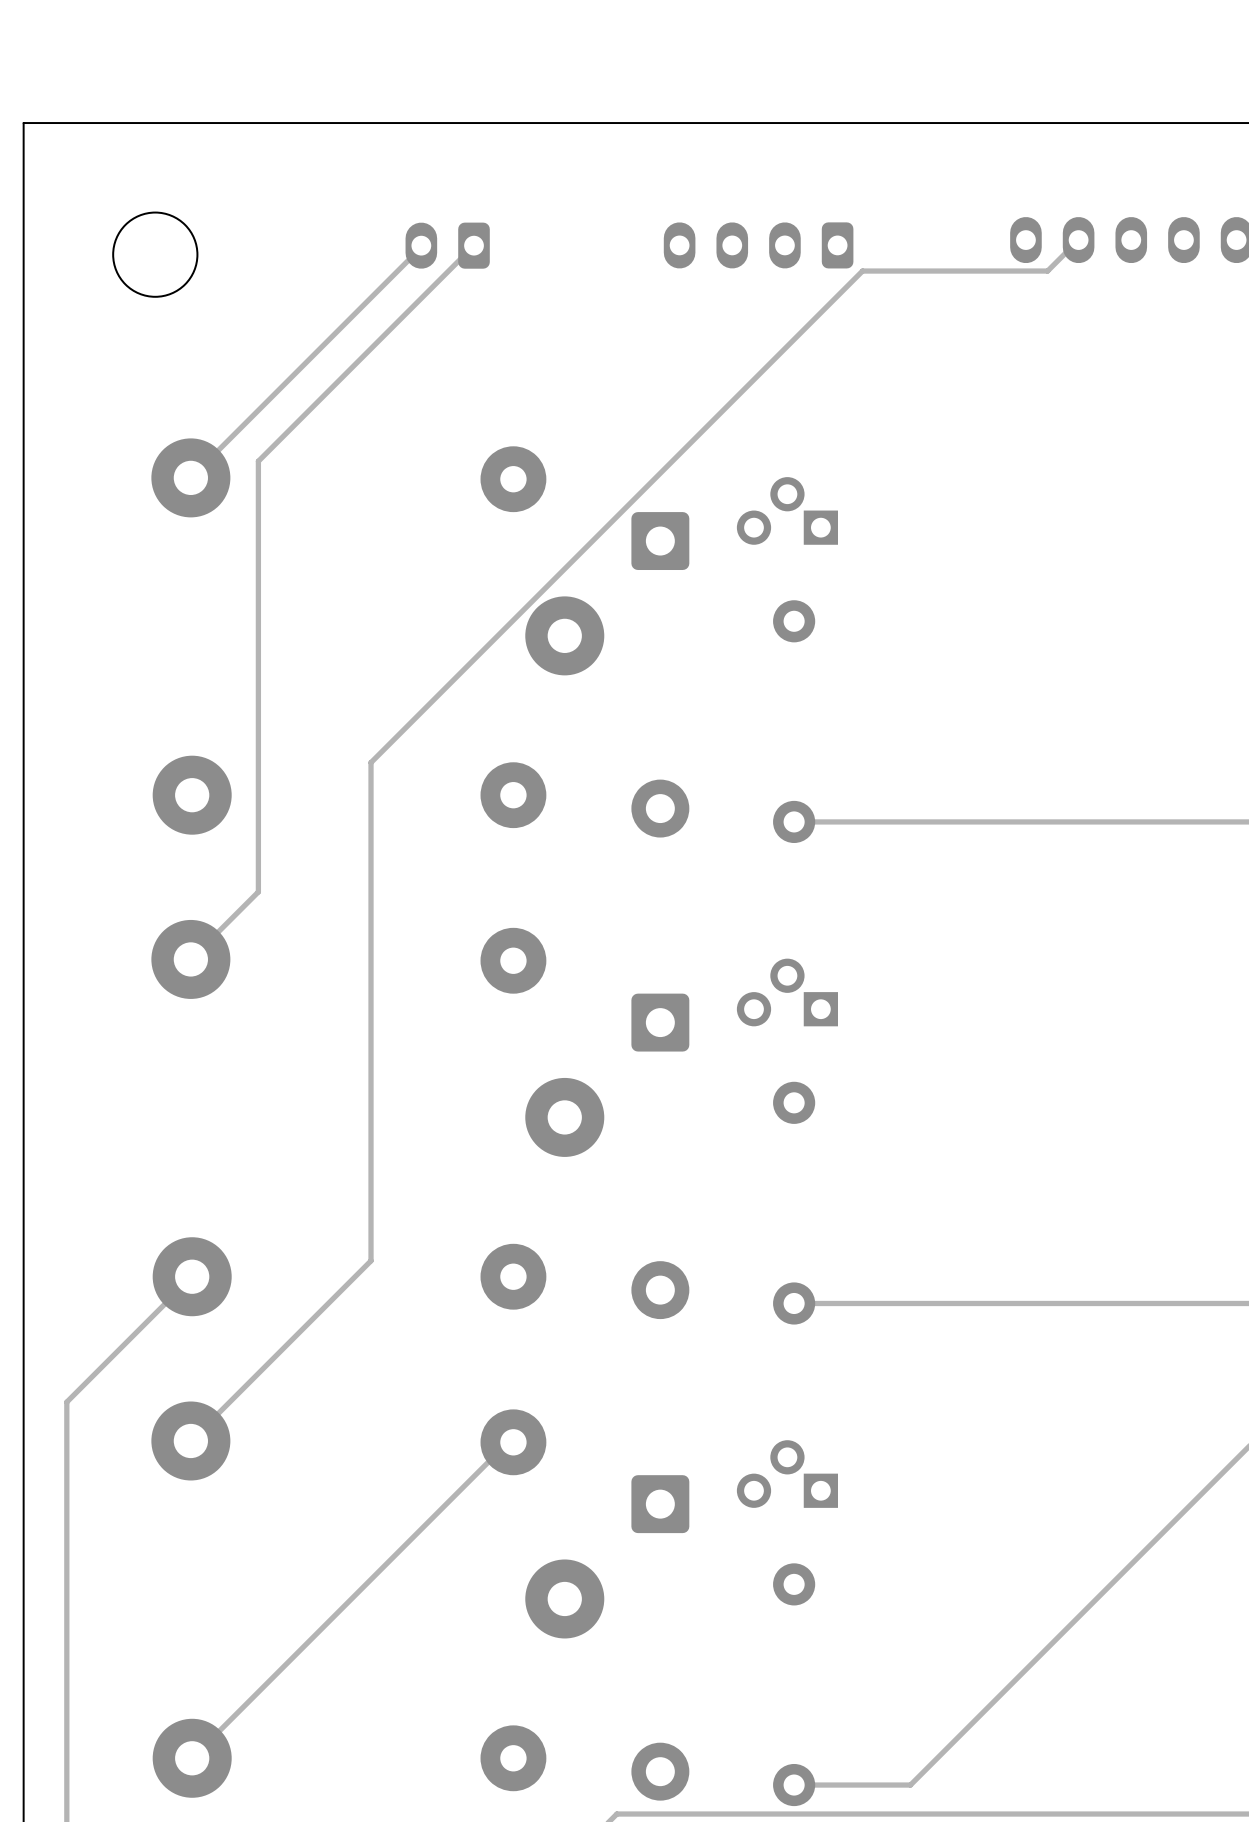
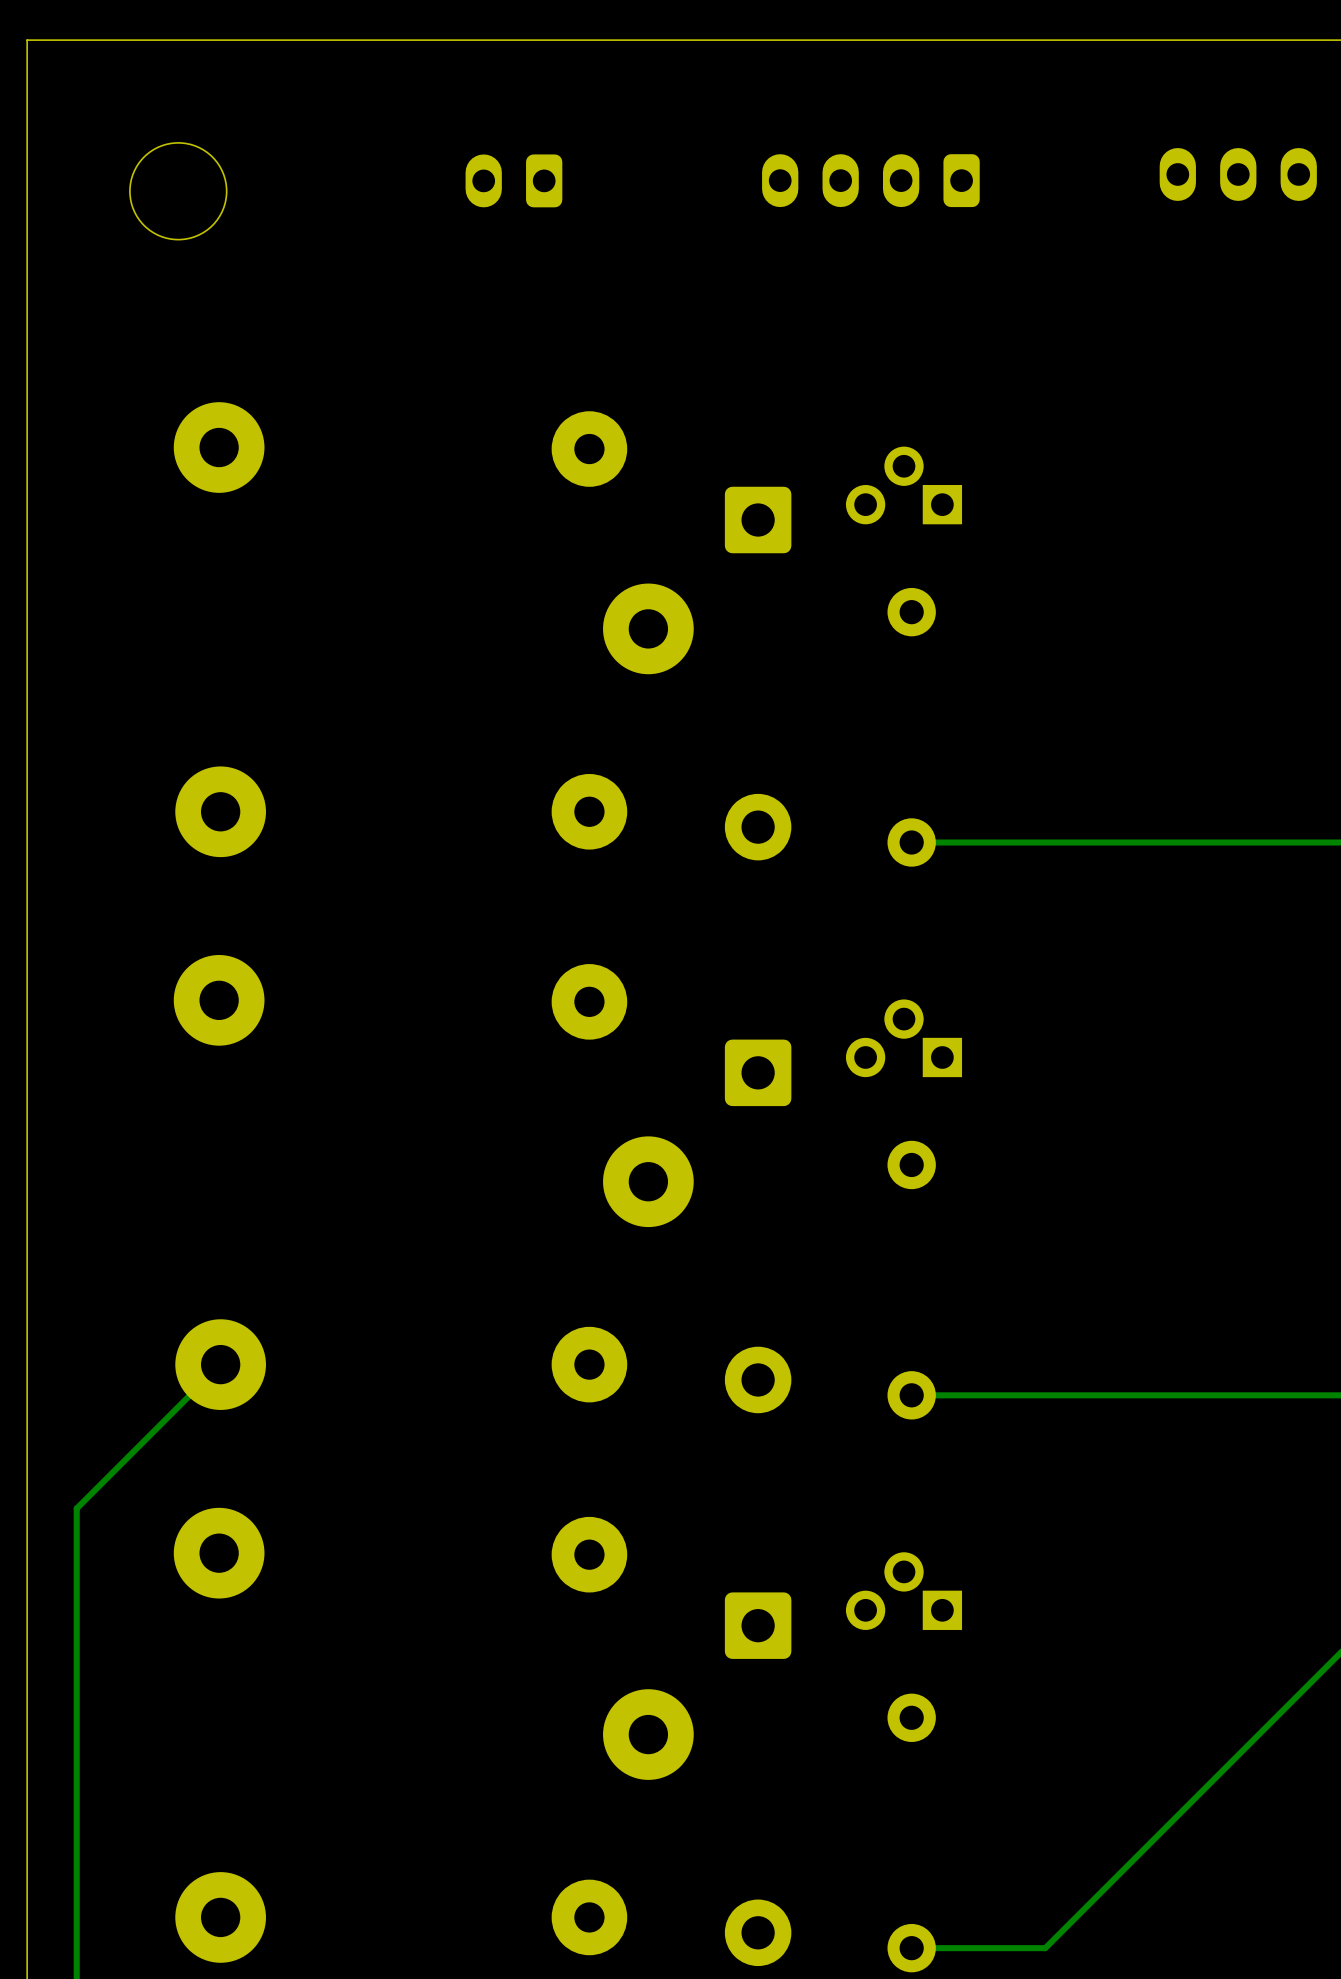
track: (1078, 240) (1047, 271) (862, 271) (371, 762) (371, 1260) (190, 1440) -> none
track: (421, 245) (190, 477) -> none
track: (474, 245) (258, 461) (258, 891) (190, 959) -> none
track: (513, 1442) (508, 1442) (192, 1758) -> none

